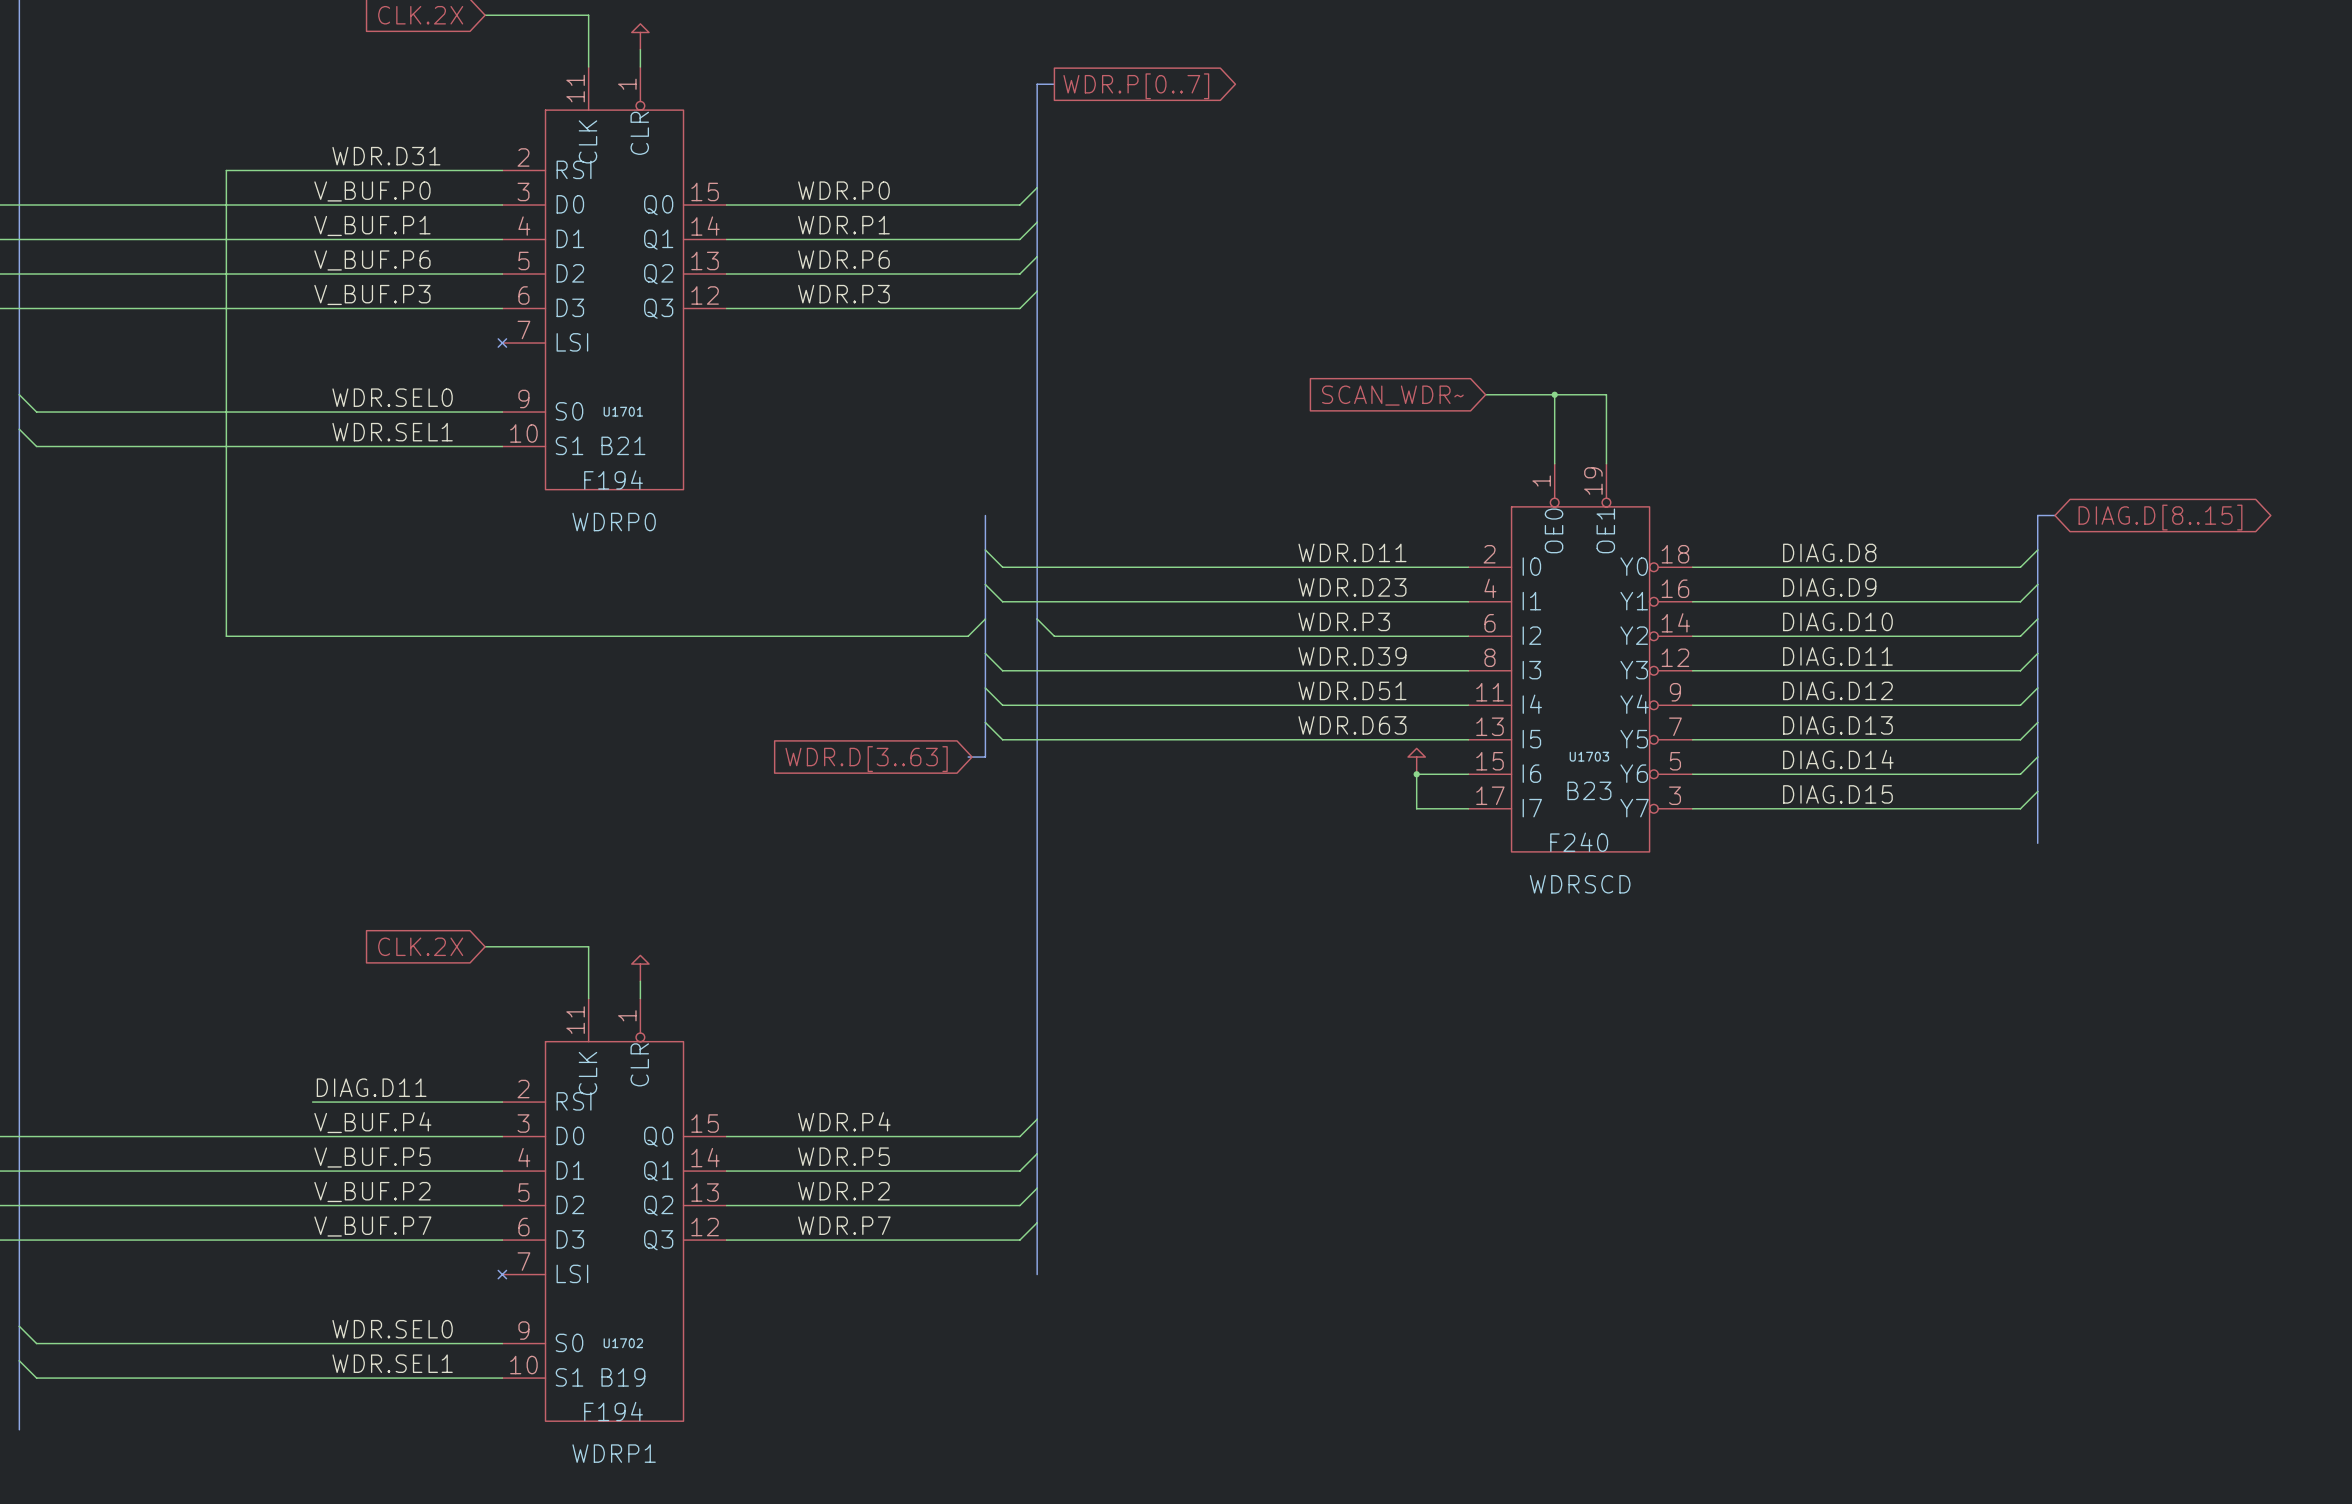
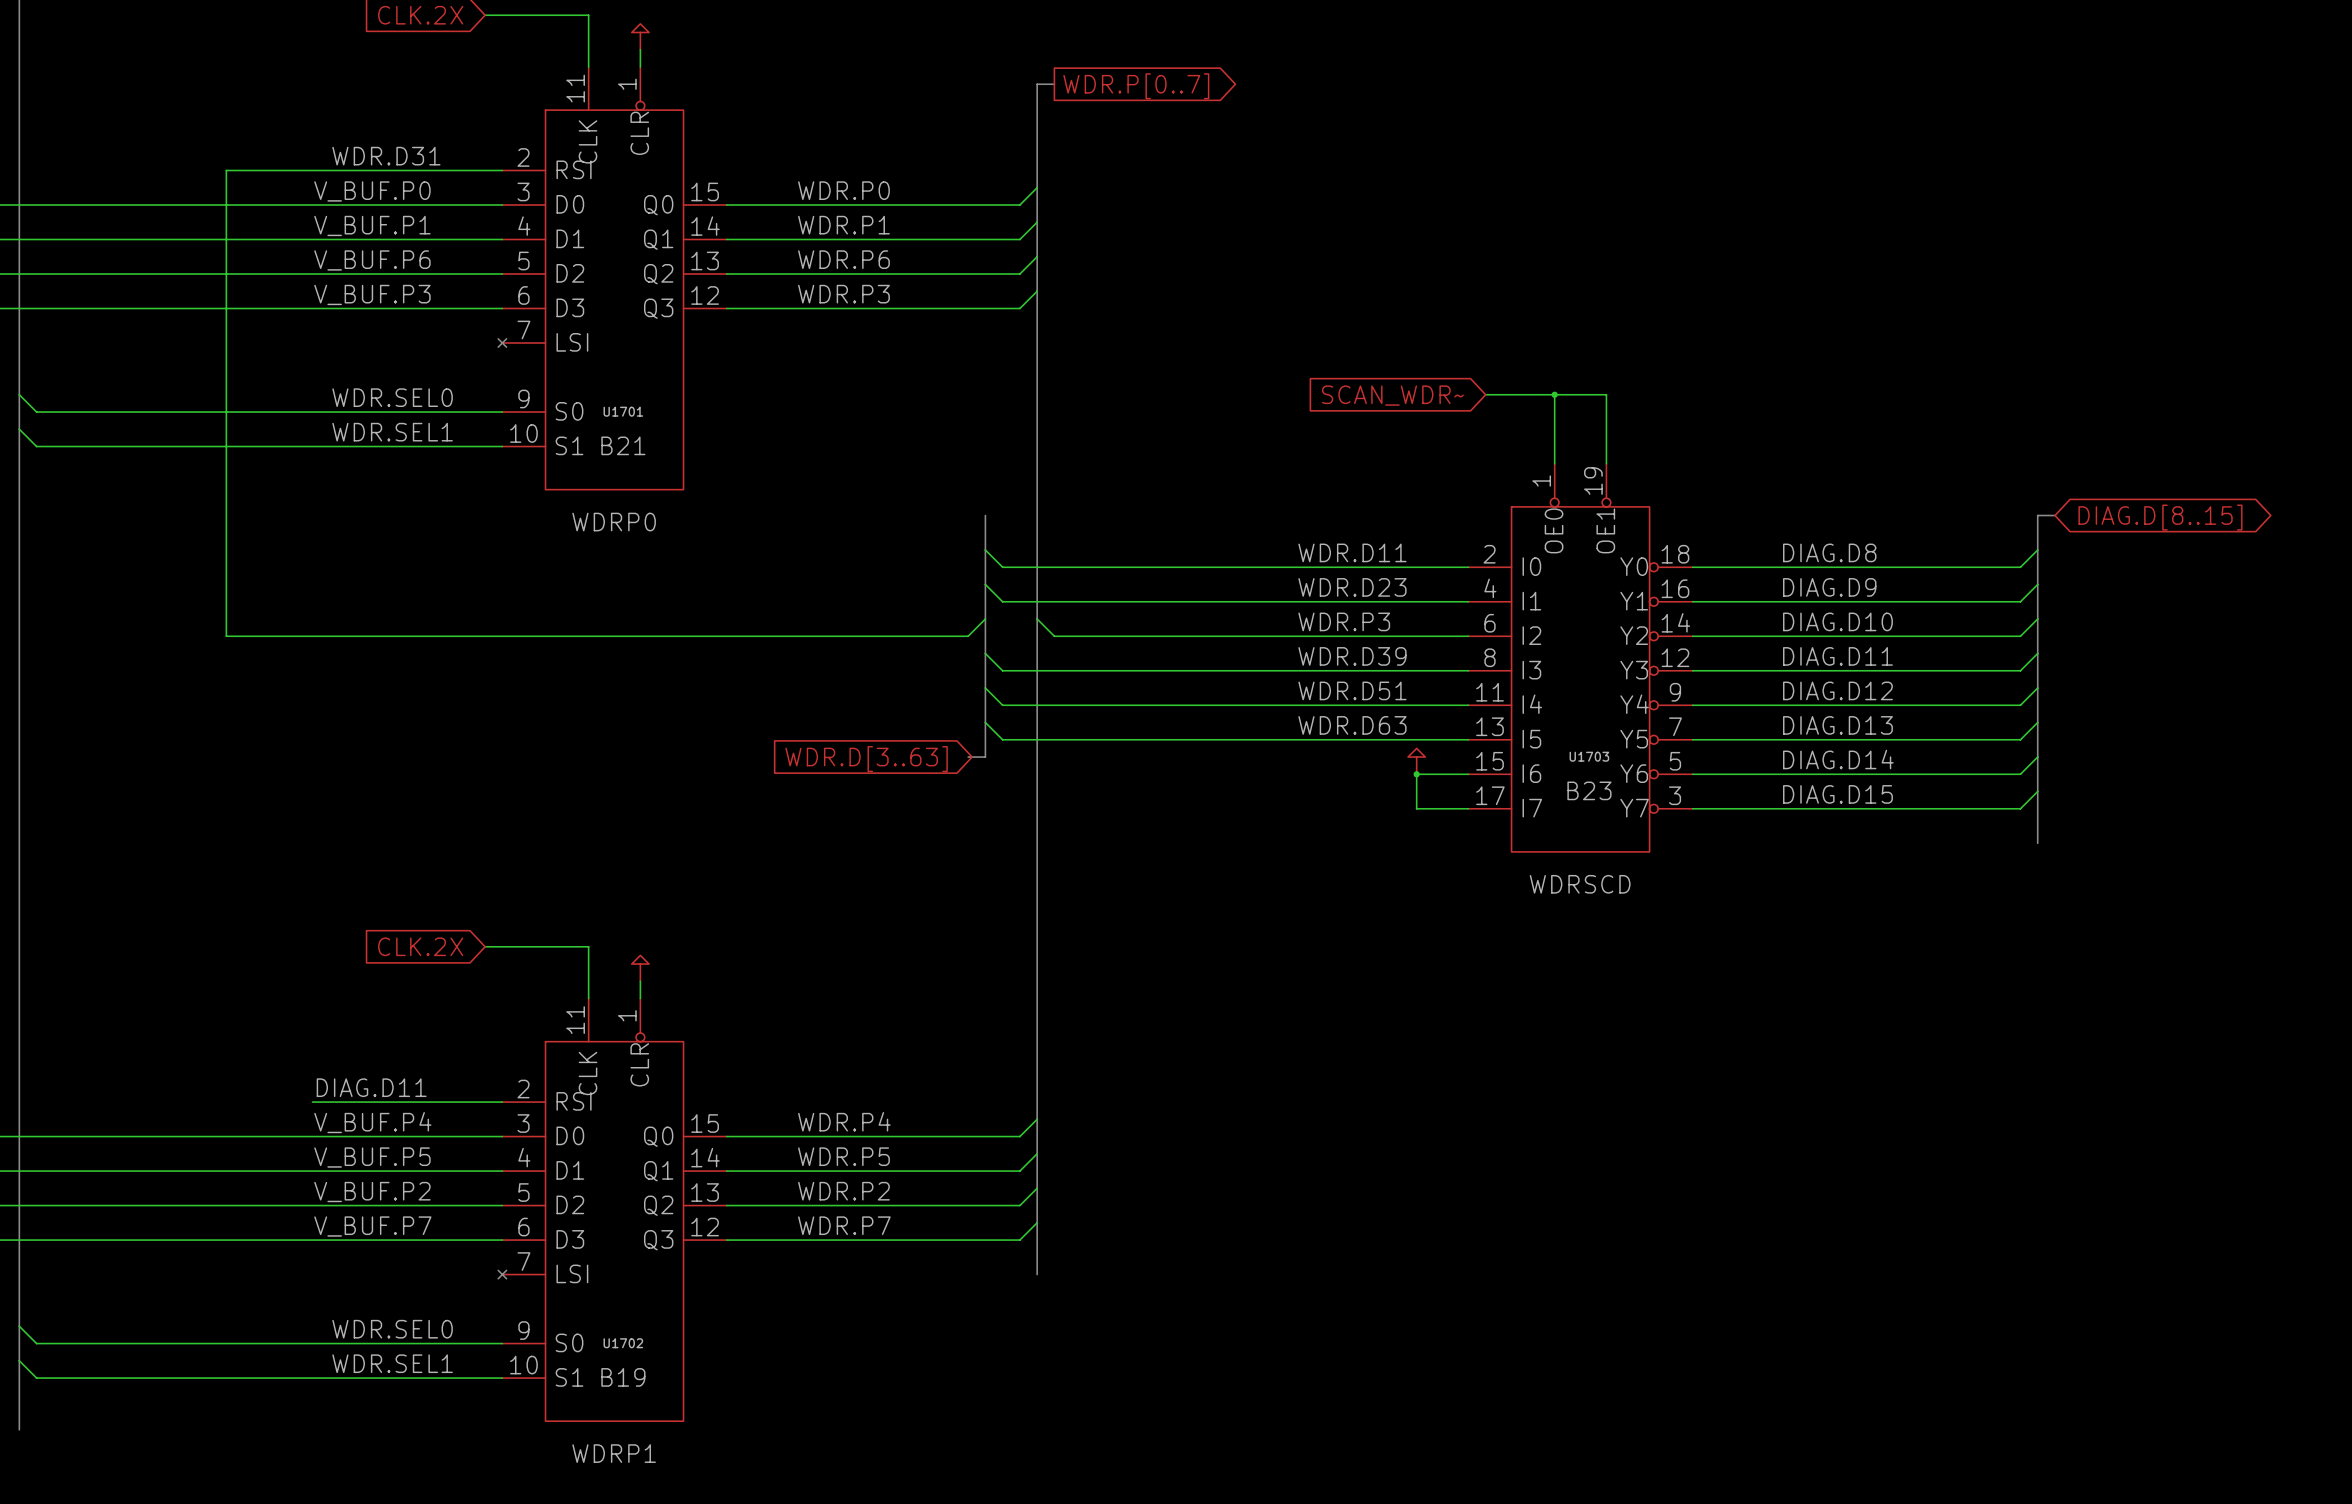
U1701 value: F194 (613, 479) -> none
U1703 value: F240 (1579, 842) -> none
U1702 value: F194 (613, 1411) -> none

